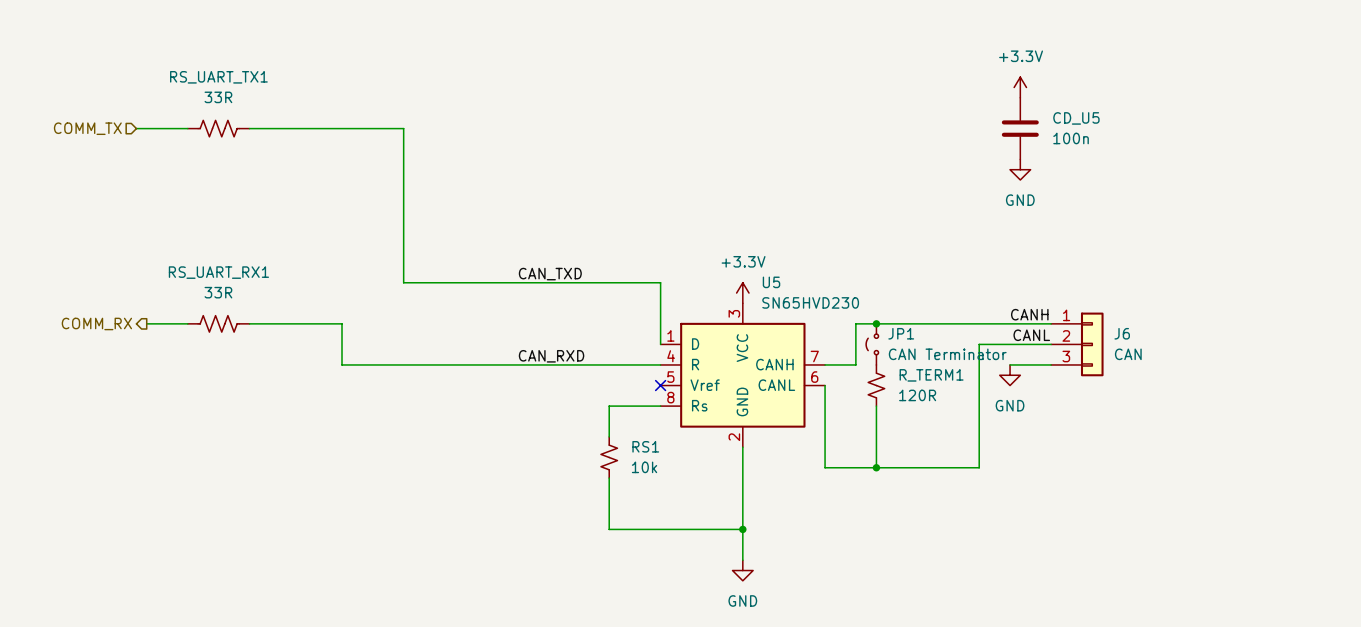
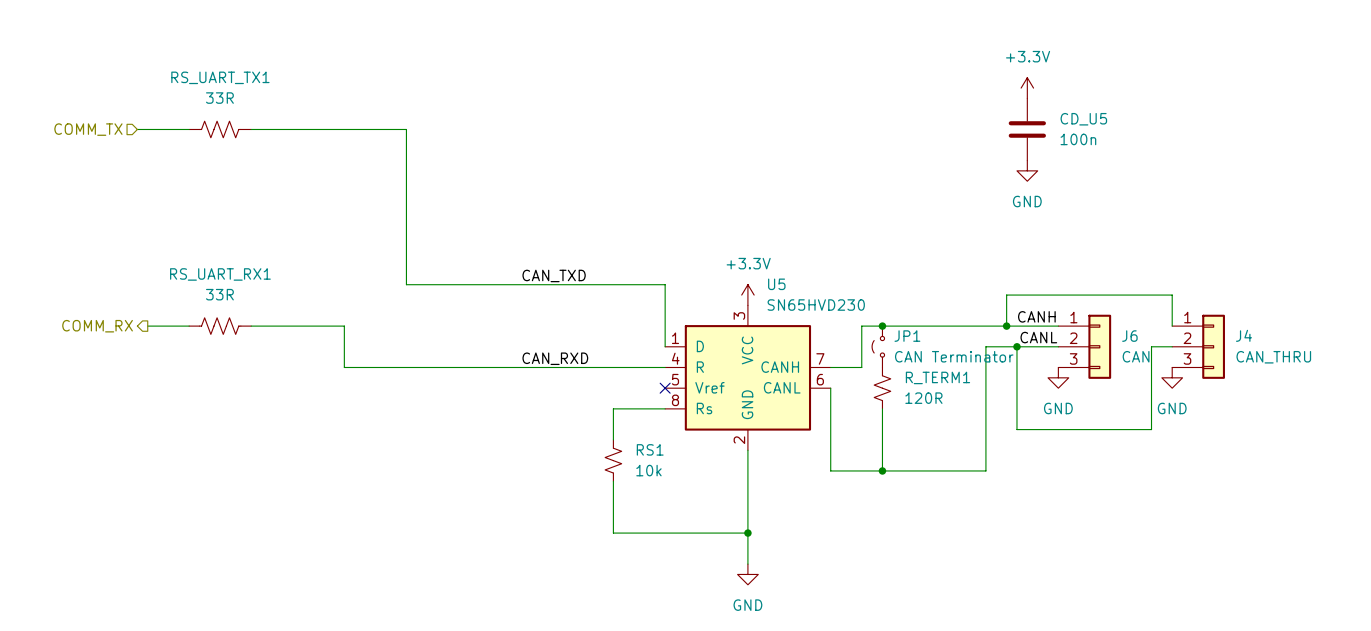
wire: none -> (1006, 326) (1006, 295) (1172, 295) (1172, 326)
junction: none -> (1006, 326)
wire: none -> (1016, 346) (1016, 429) (1151, 429) (1151, 346) (1172, 346)
junction: none -> (1016, 346)
J4: none -> CAN_THRU (1198, 346)
wire: (1010, 364) (1051, 364) -> none
power symbol position: GND (1010, 375) -> GND (1058, 377)
power symbol: none -> GND (1172, 377)

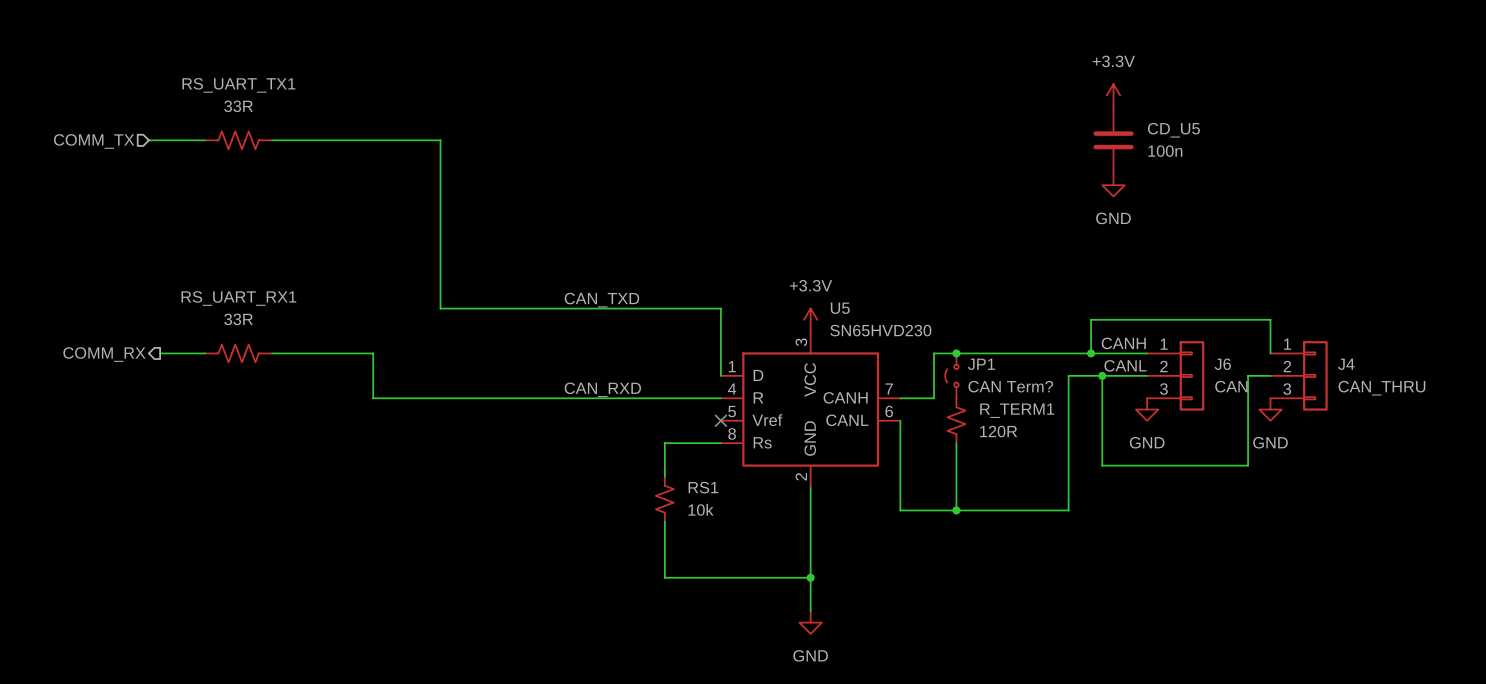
JP1 value: CAN Terminator (954, 356) -> CAN Term? (1010, 386)

